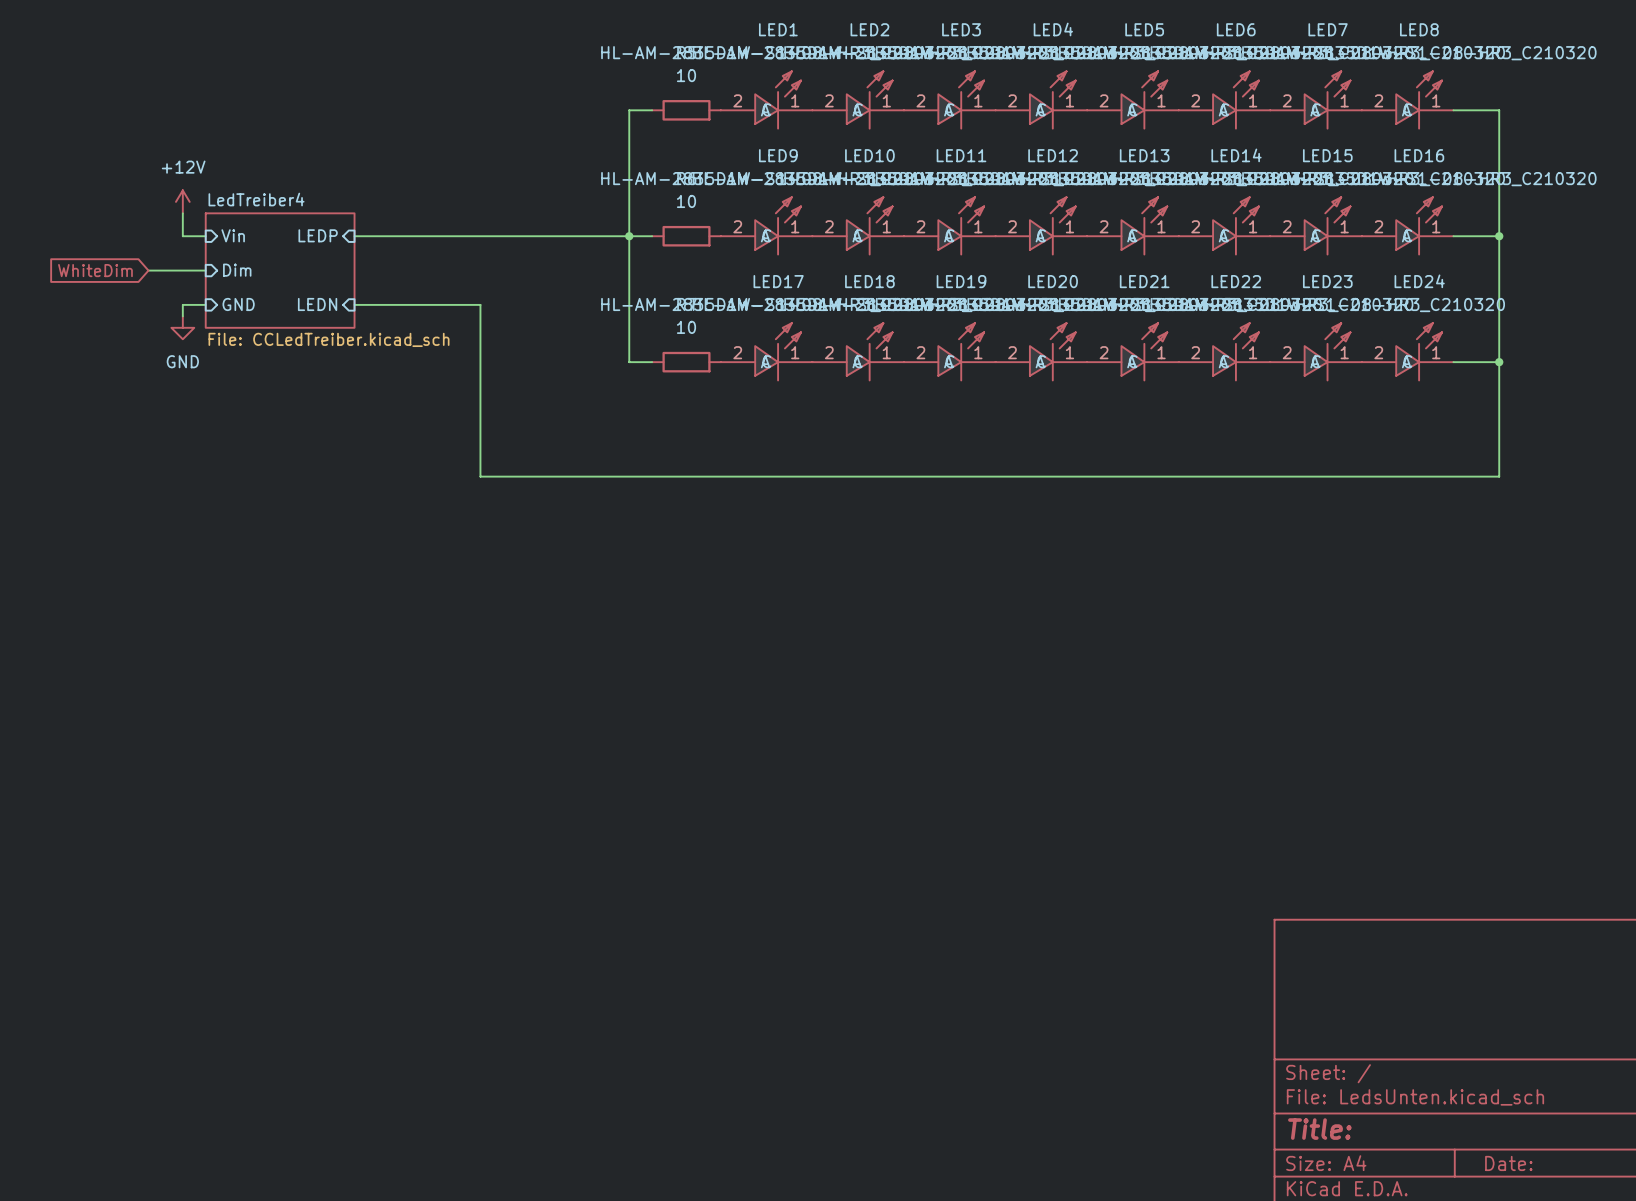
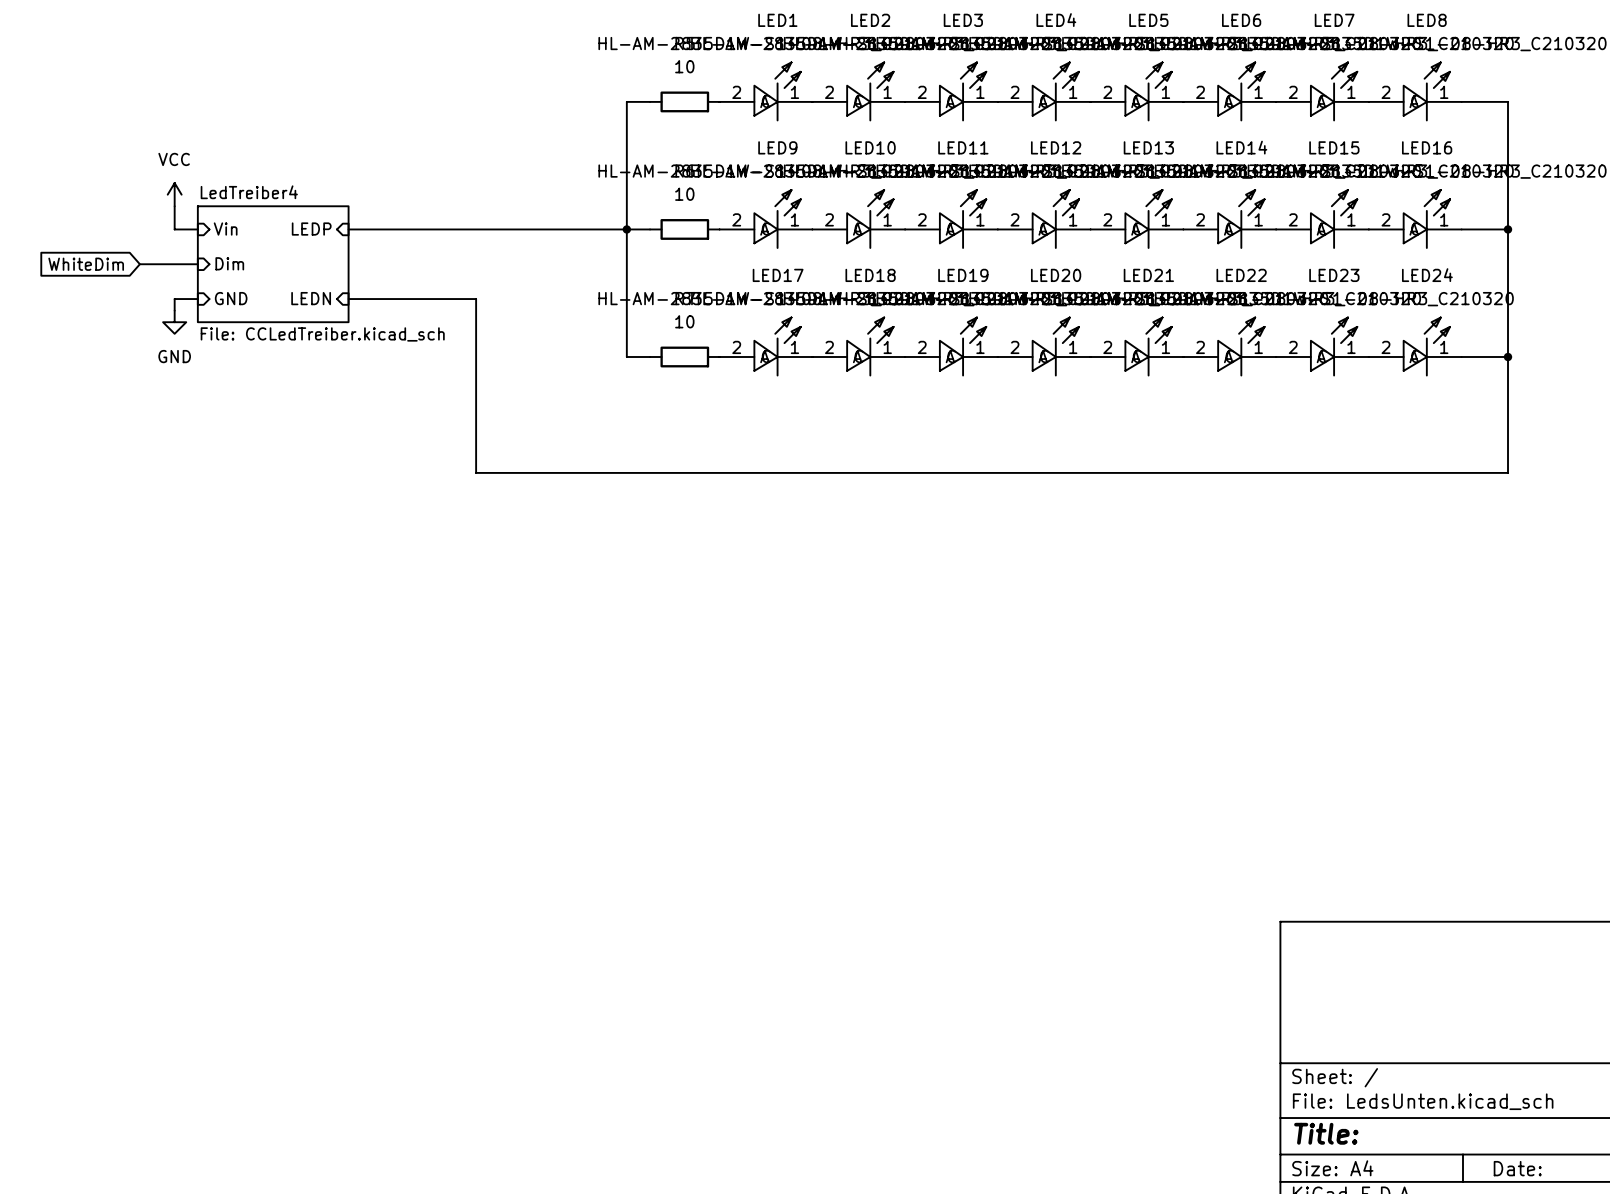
power symbol: +12V (182, 201) -> VCC (174, 194)

